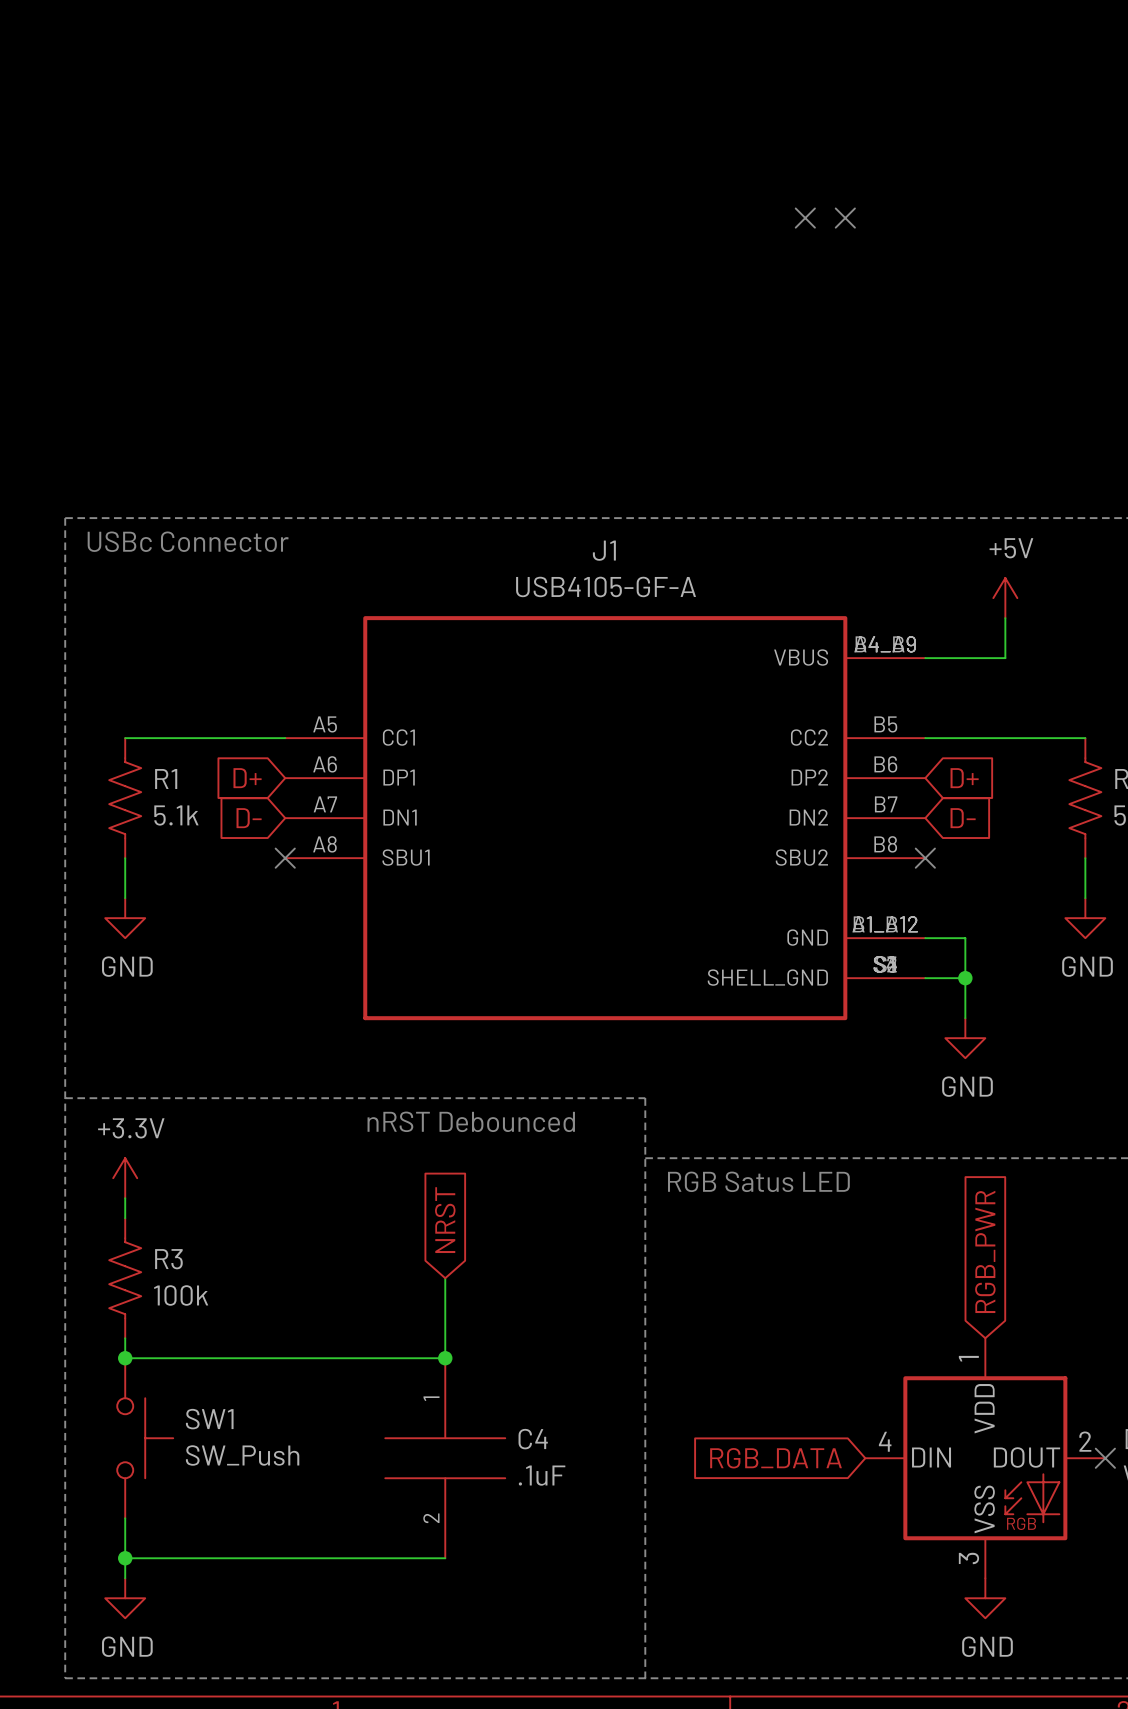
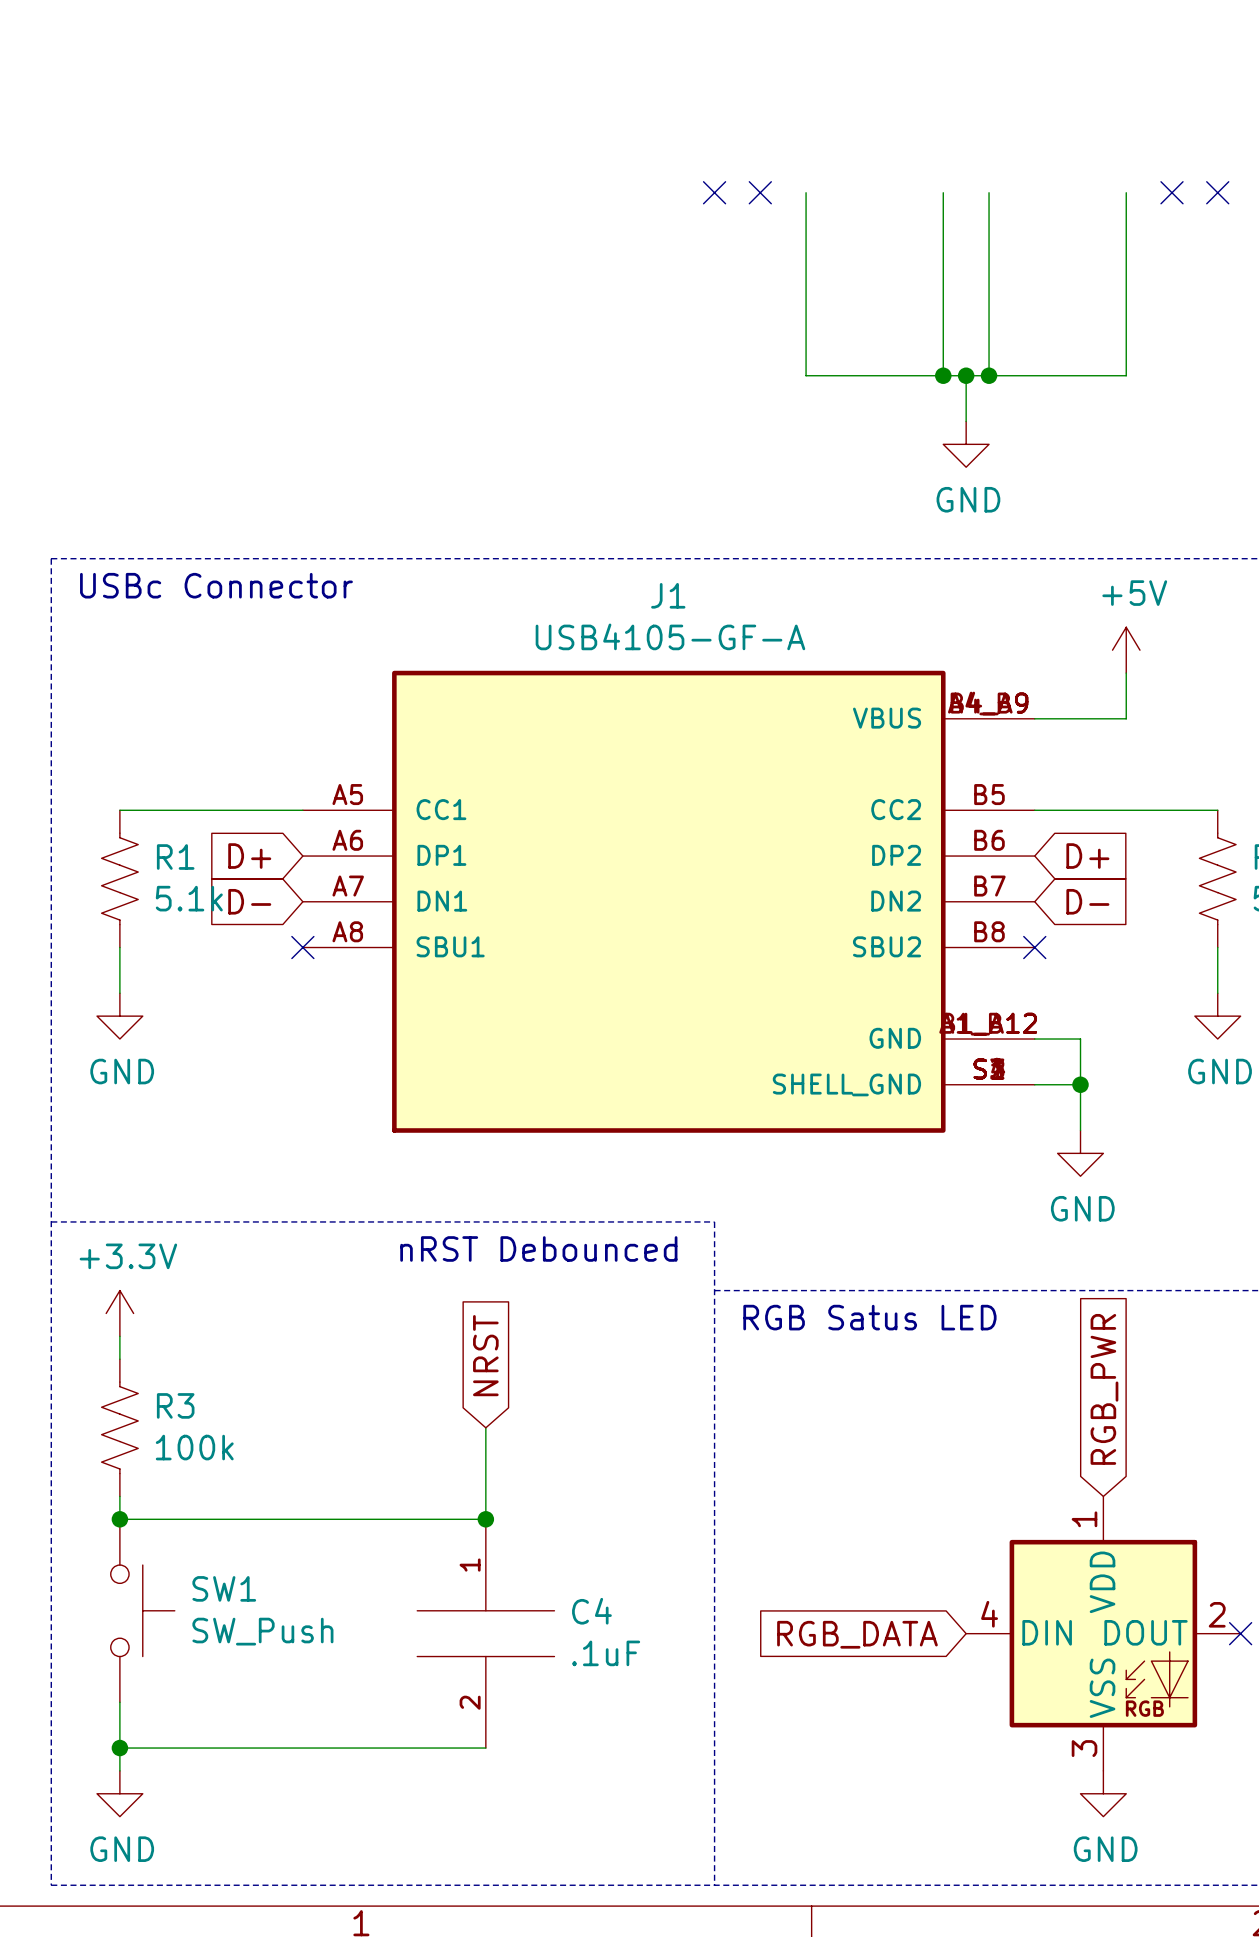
no-connect mark: none -> (714, 192)
no-connect mark: none -> (760, 192)
wire: none -> (806, 192) (806, 375) (1126, 375) (1126, 192)
wire: none -> (943, 192) (943, 375)
wire: none -> (989, 192) (989, 375)
no-connect mark: none -> (1172, 192)
no-connect mark: none -> (1217, 192)
no-connect mark: (805, 218) -> none
no-connect mark: (845, 218) -> none
junction: none -> (943, 375)
wire: none -> (966, 375) (966, 421)
junction: none -> (966, 375)
junction: none -> (989, 375)
power symbol: none -> GND (966, 444)

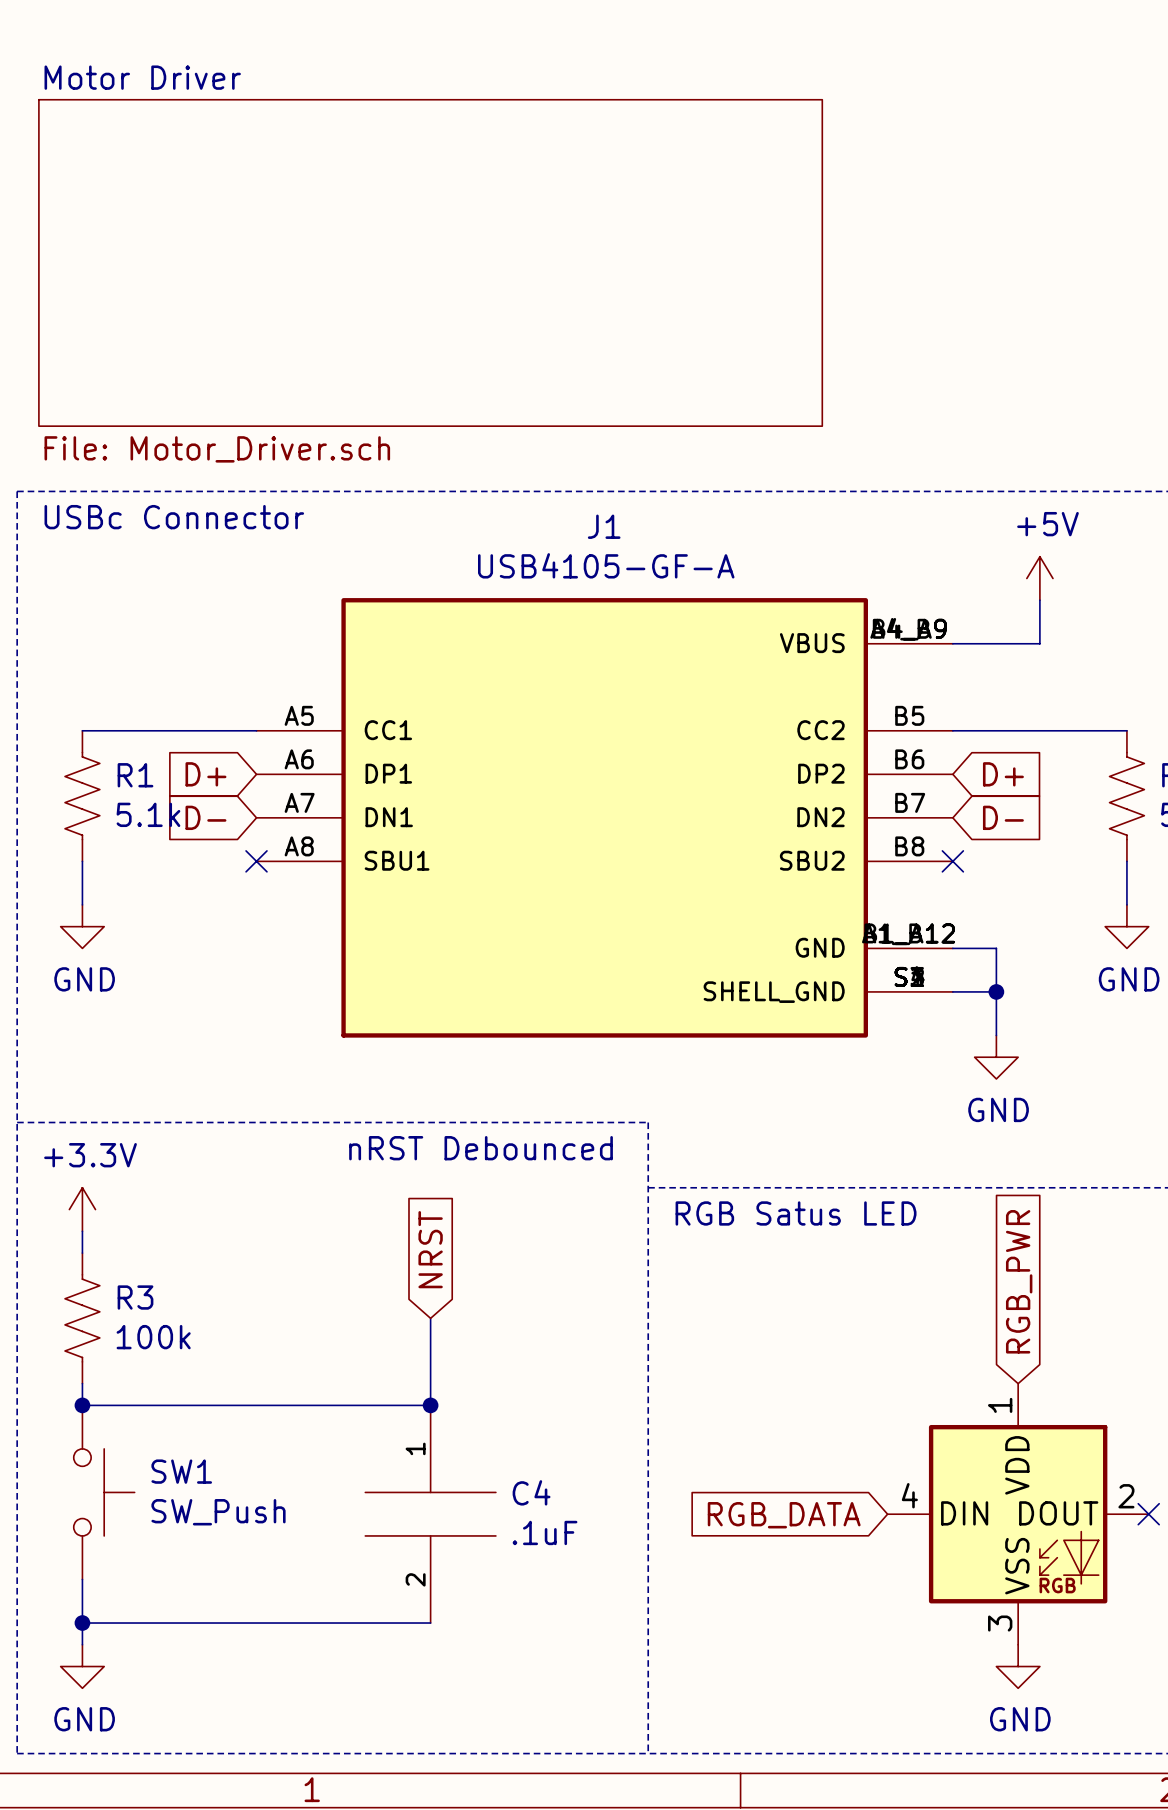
no-connect mark: (714, 192) -> none
no-connect mark: (760, 192) -> none
wire: (806, 192) (806, 375) (1126, 375) (1126, 192) -> none
wire: (943, 192) (943, 375) -> none
wire: (989, 192) (989, 375) -> none
no-connect mark: (1172, 192) -> none
no-connect mark: (1217, 192) -> none
sheet Motor Driver: none -> File: Motor_Driver.sch (430, 262)
junction: (943, 375) -> none
wire: (966, 375) (966, 421) -> none
junction: (966, 375) -> none
junction: (989, 375) -> none
power symbol: GND (966, 444) -> none

